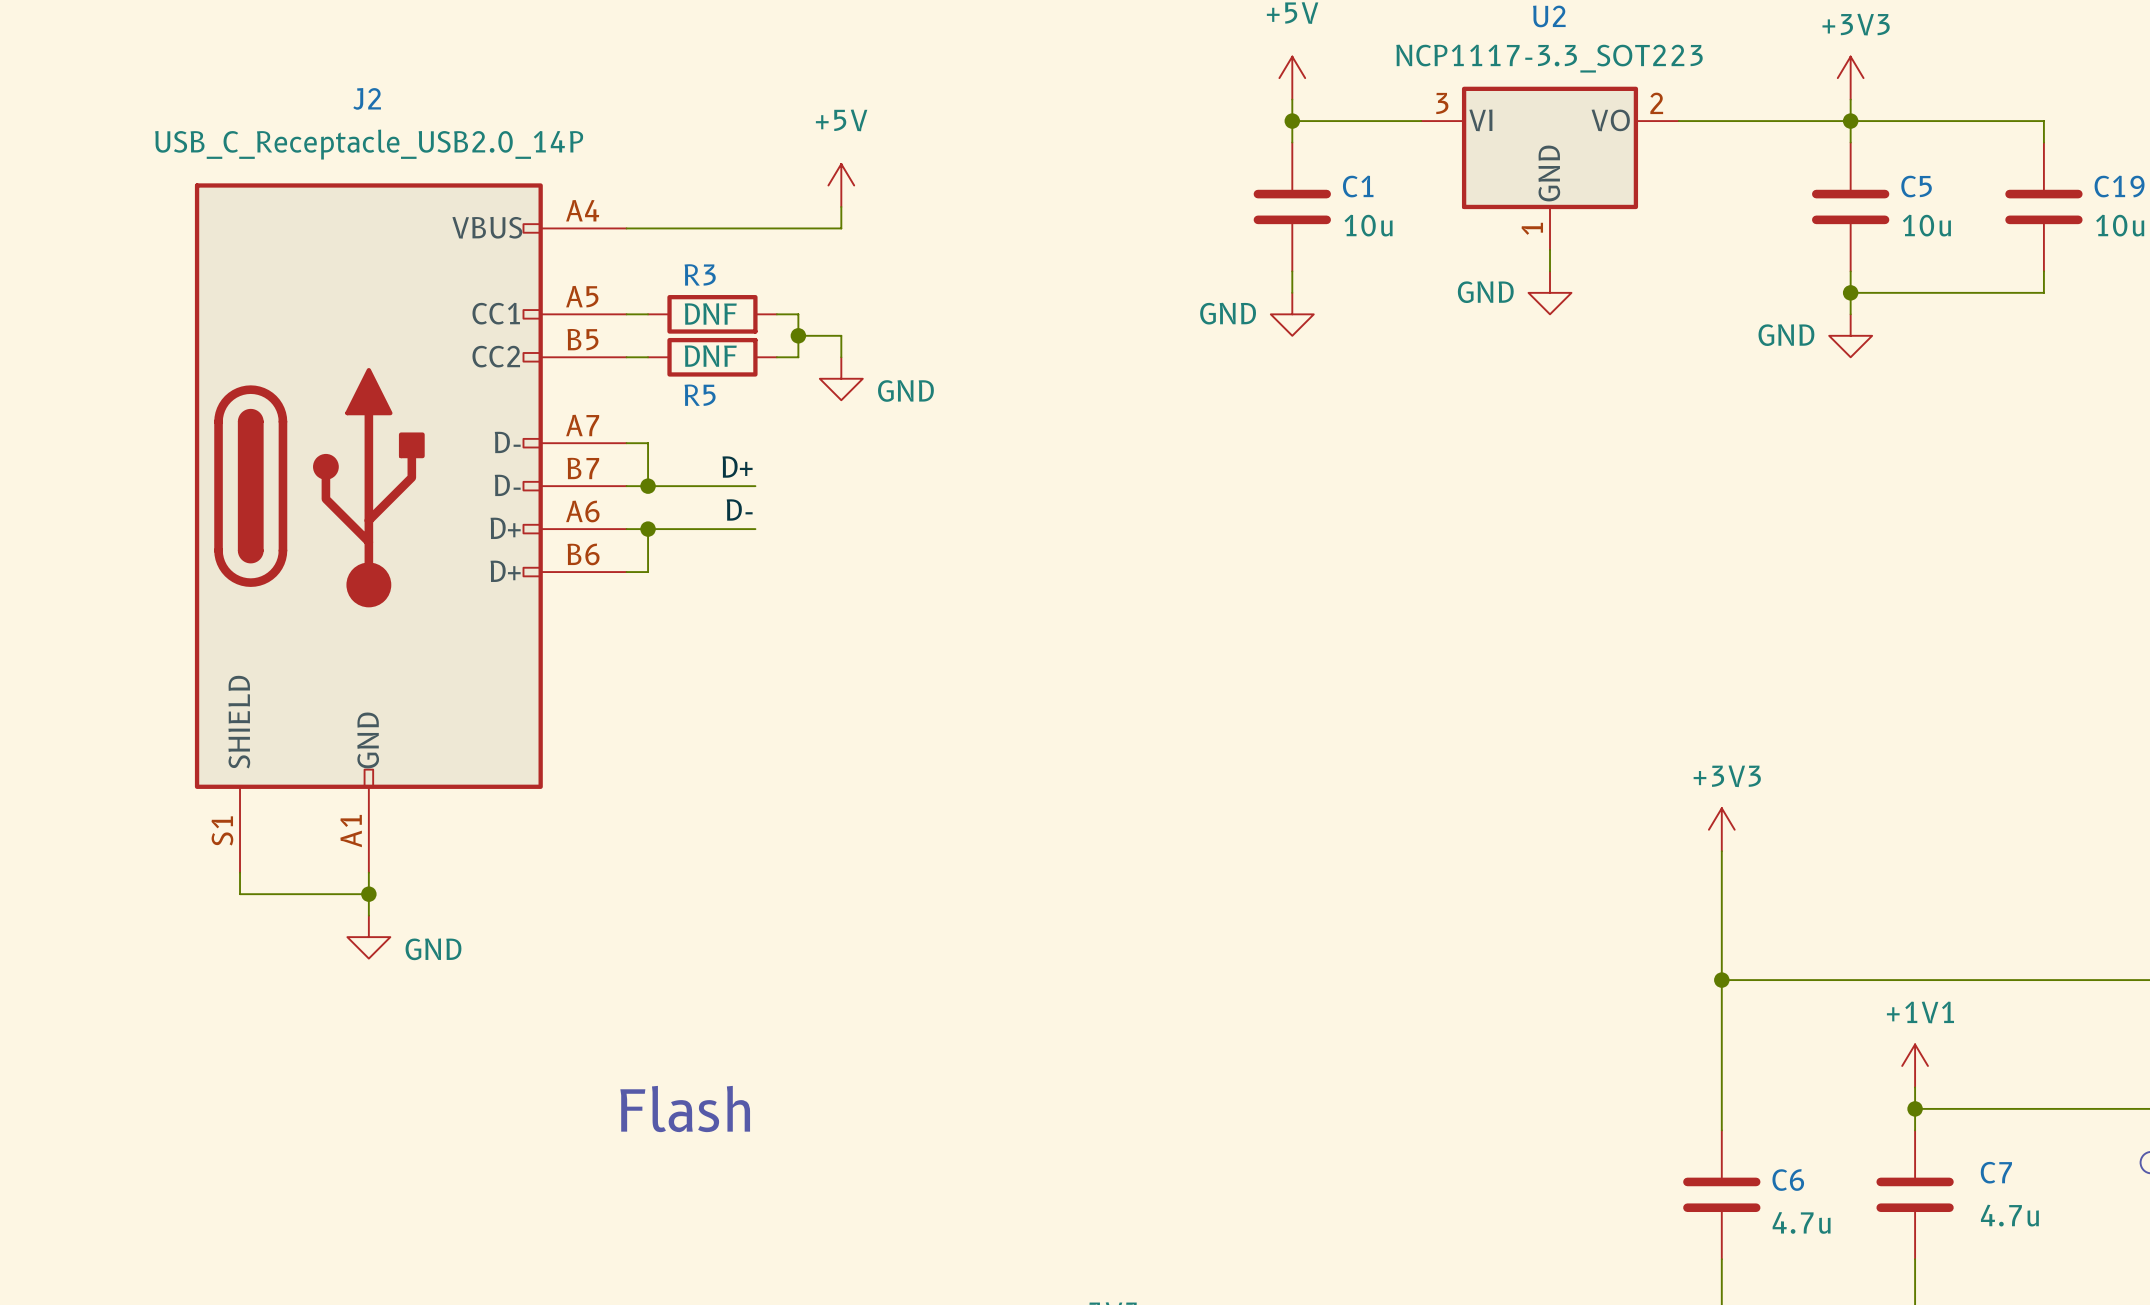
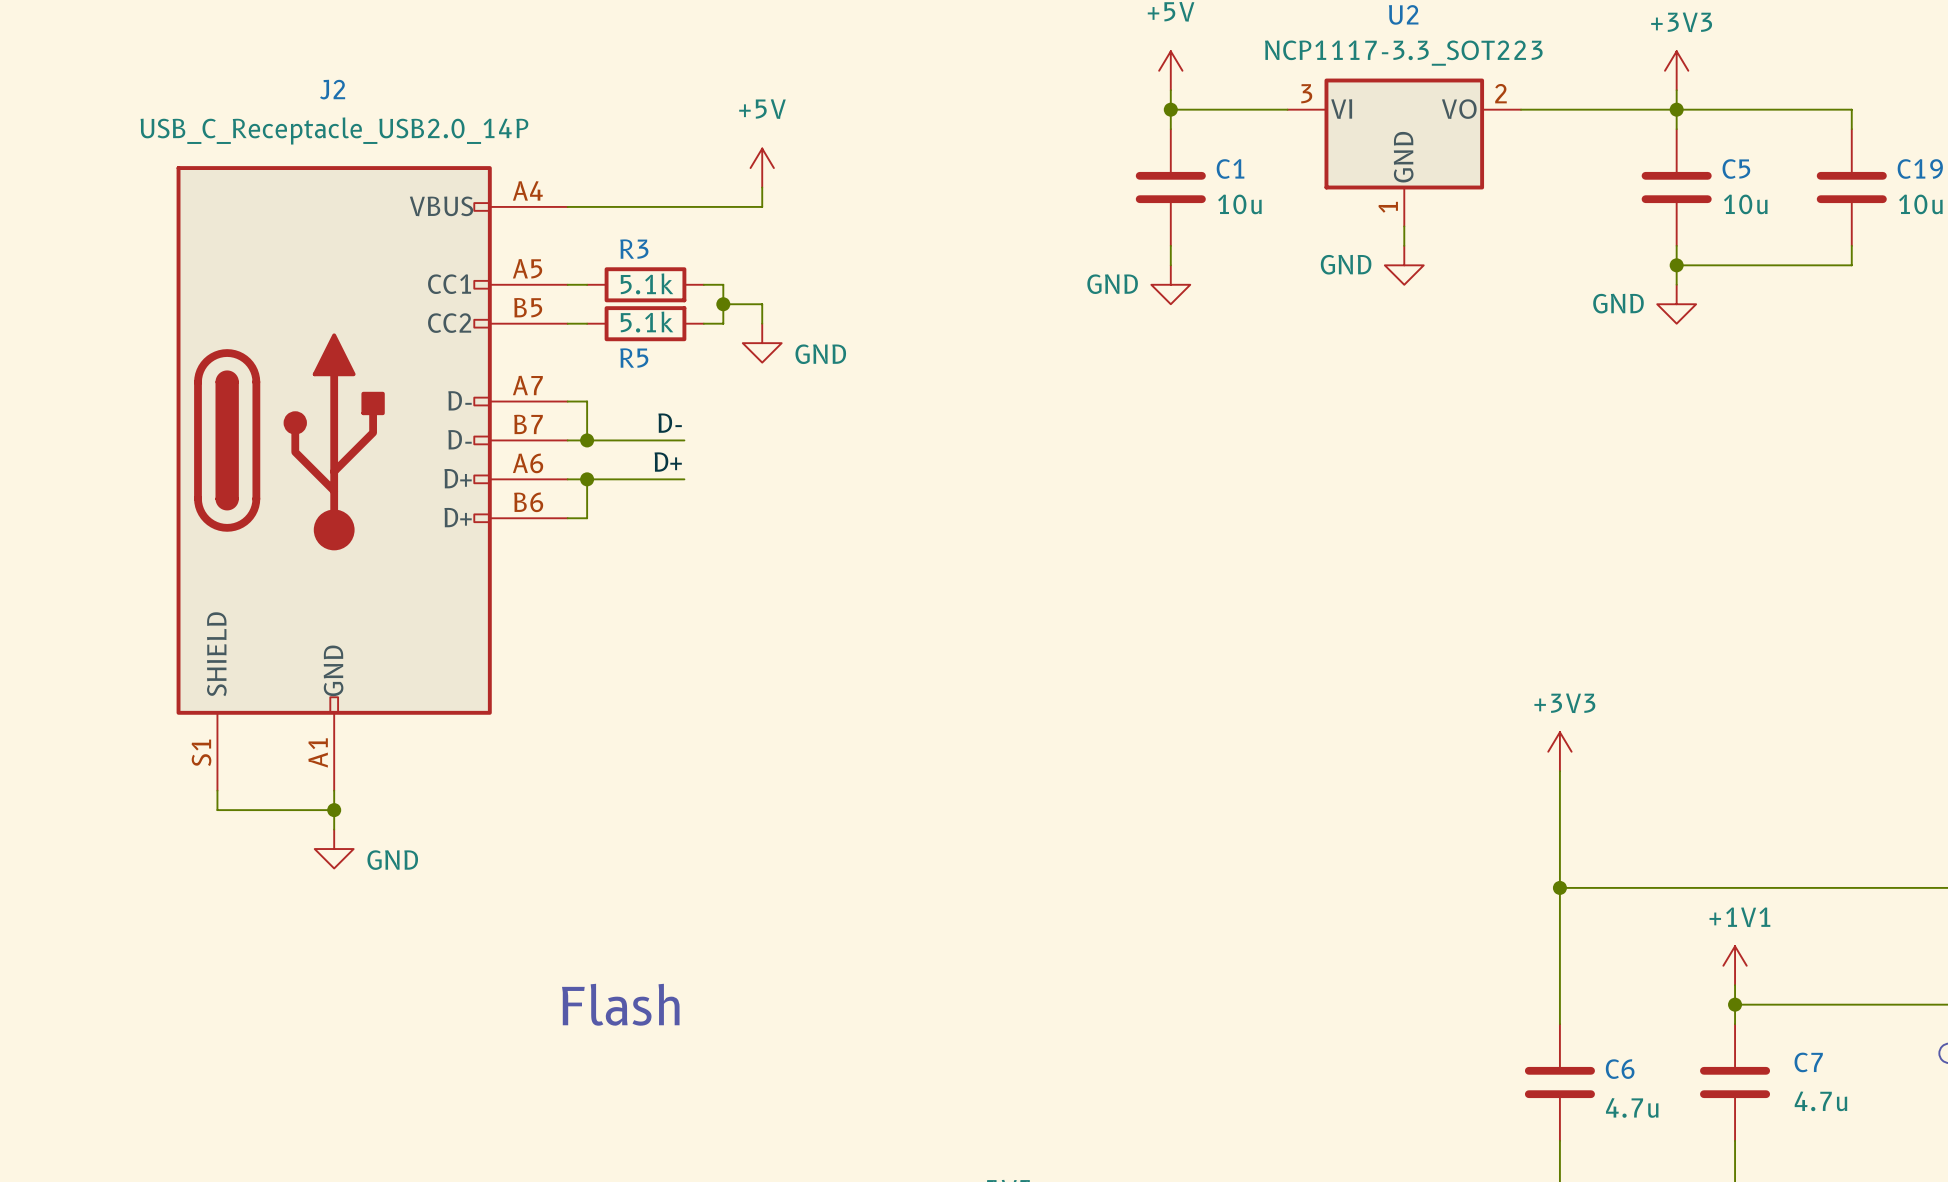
R3 value: DNF (710, 313) -> 5.1k (647, 283)
R5 value: DNF (710, 356) -> 5.1k (647, 322)
label: D+ (737, 467) -> D- (670, 423)
label: D- (739, 509) -> D+ (668, 462)

